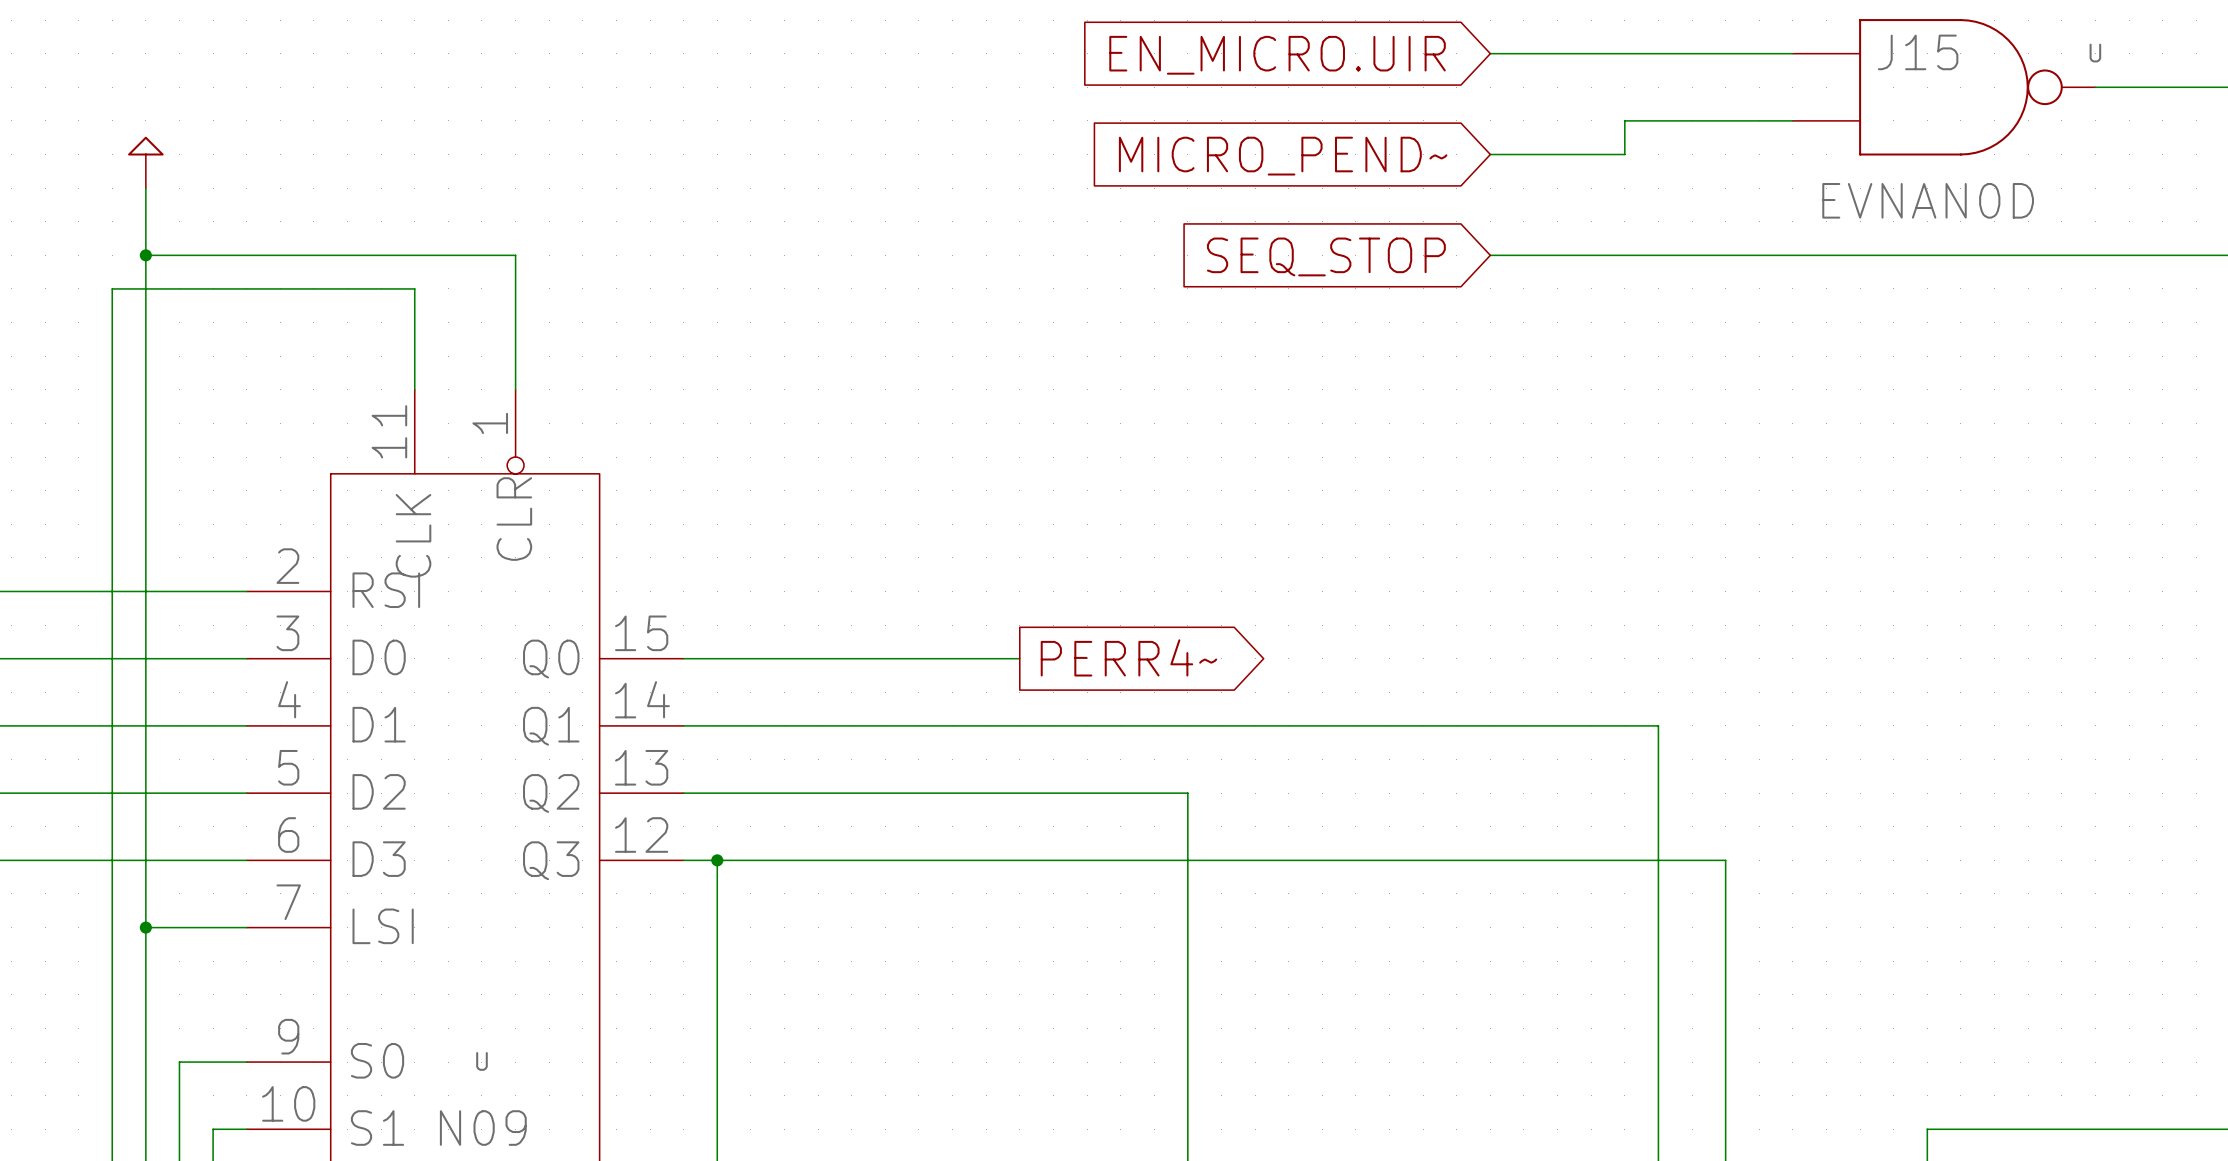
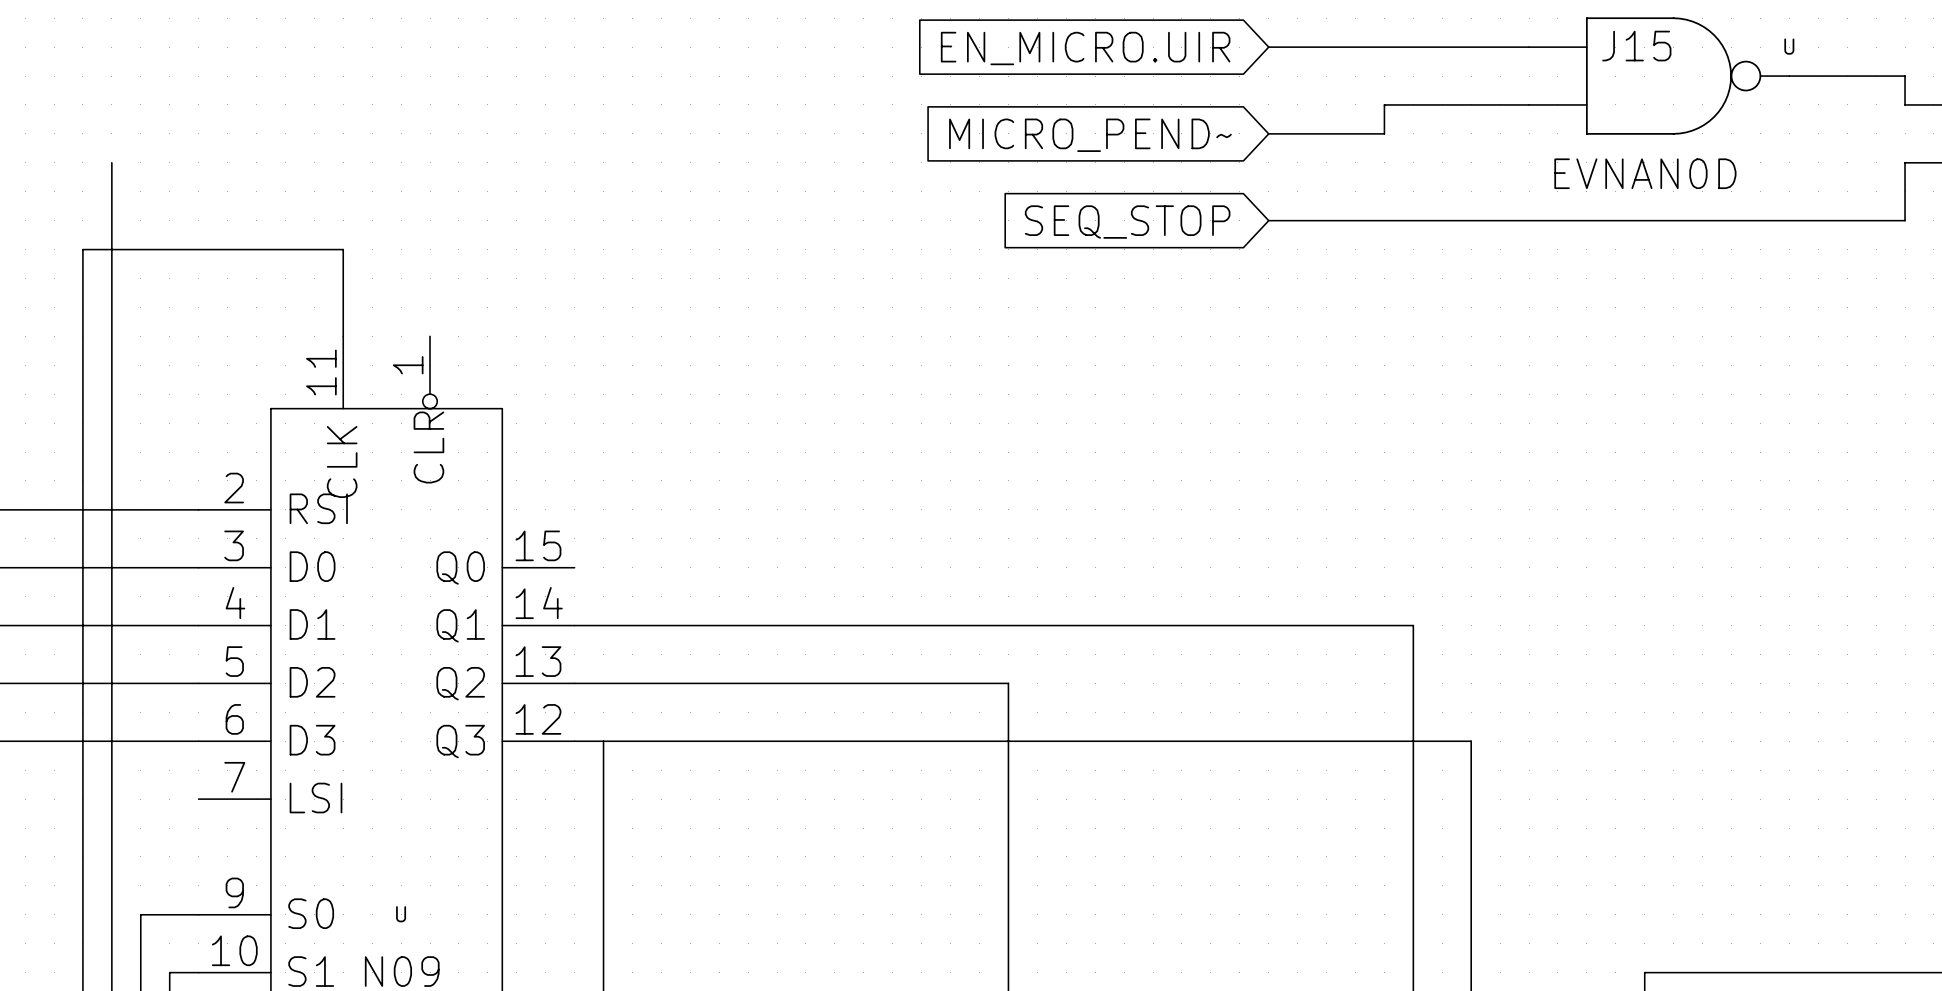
power symbol: (145, 162) -> none
wire: (145, 255) (515, 255) (515, 389) -> none
junction: (145, 255) -> none
global label: PERR4~ (1128, 657) -> none
wire: (683, 658) (1019, 658) -> none
junction: (717, 860) -> none
wire: (145, 927) (246, 927) -> none
junction: (145, 927) -> none

